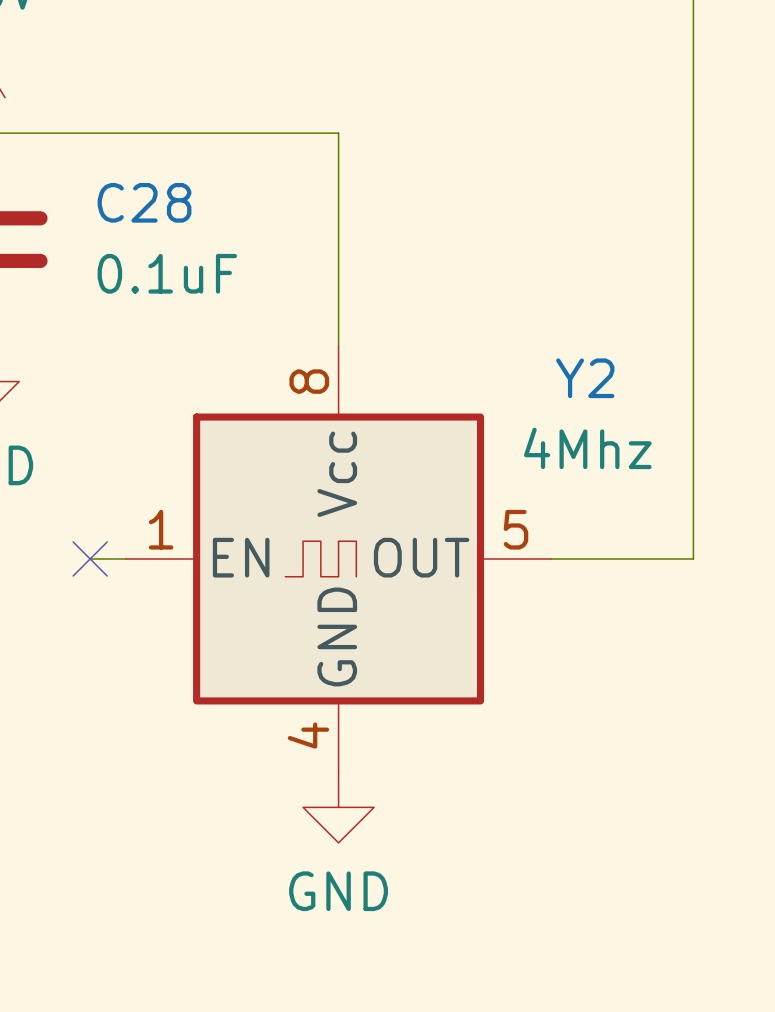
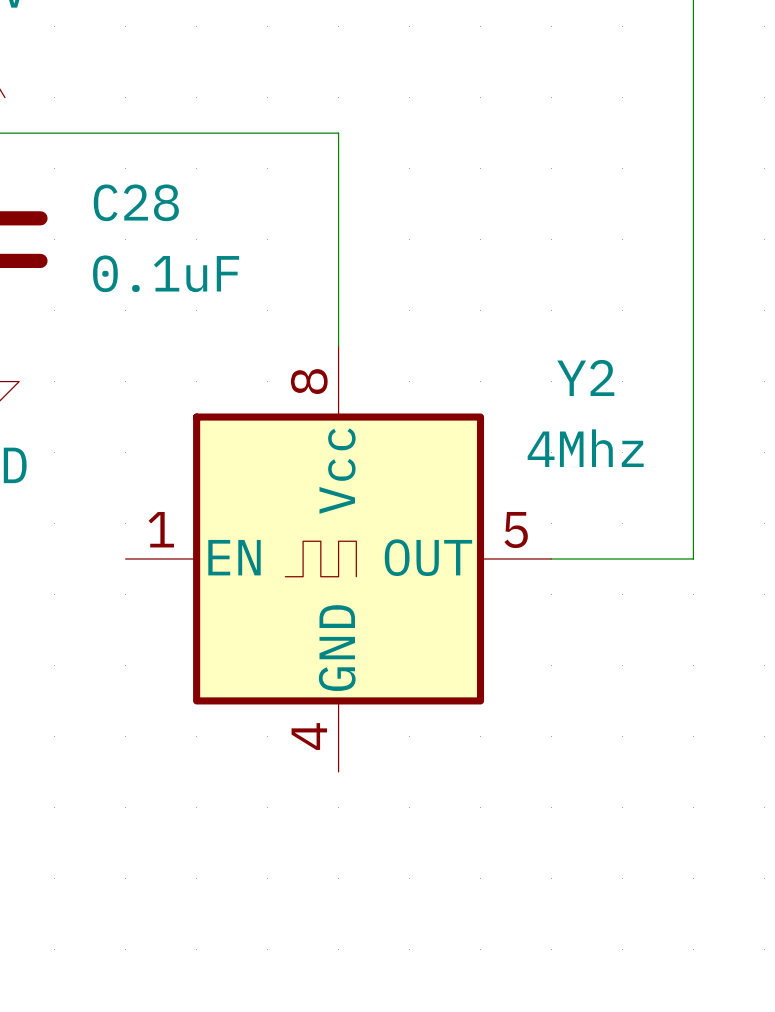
wire: (90, 558) (125, 558) -> none
no-connect mark: (90, 558) -> none
power symbol: GND (338, 807) -> none

